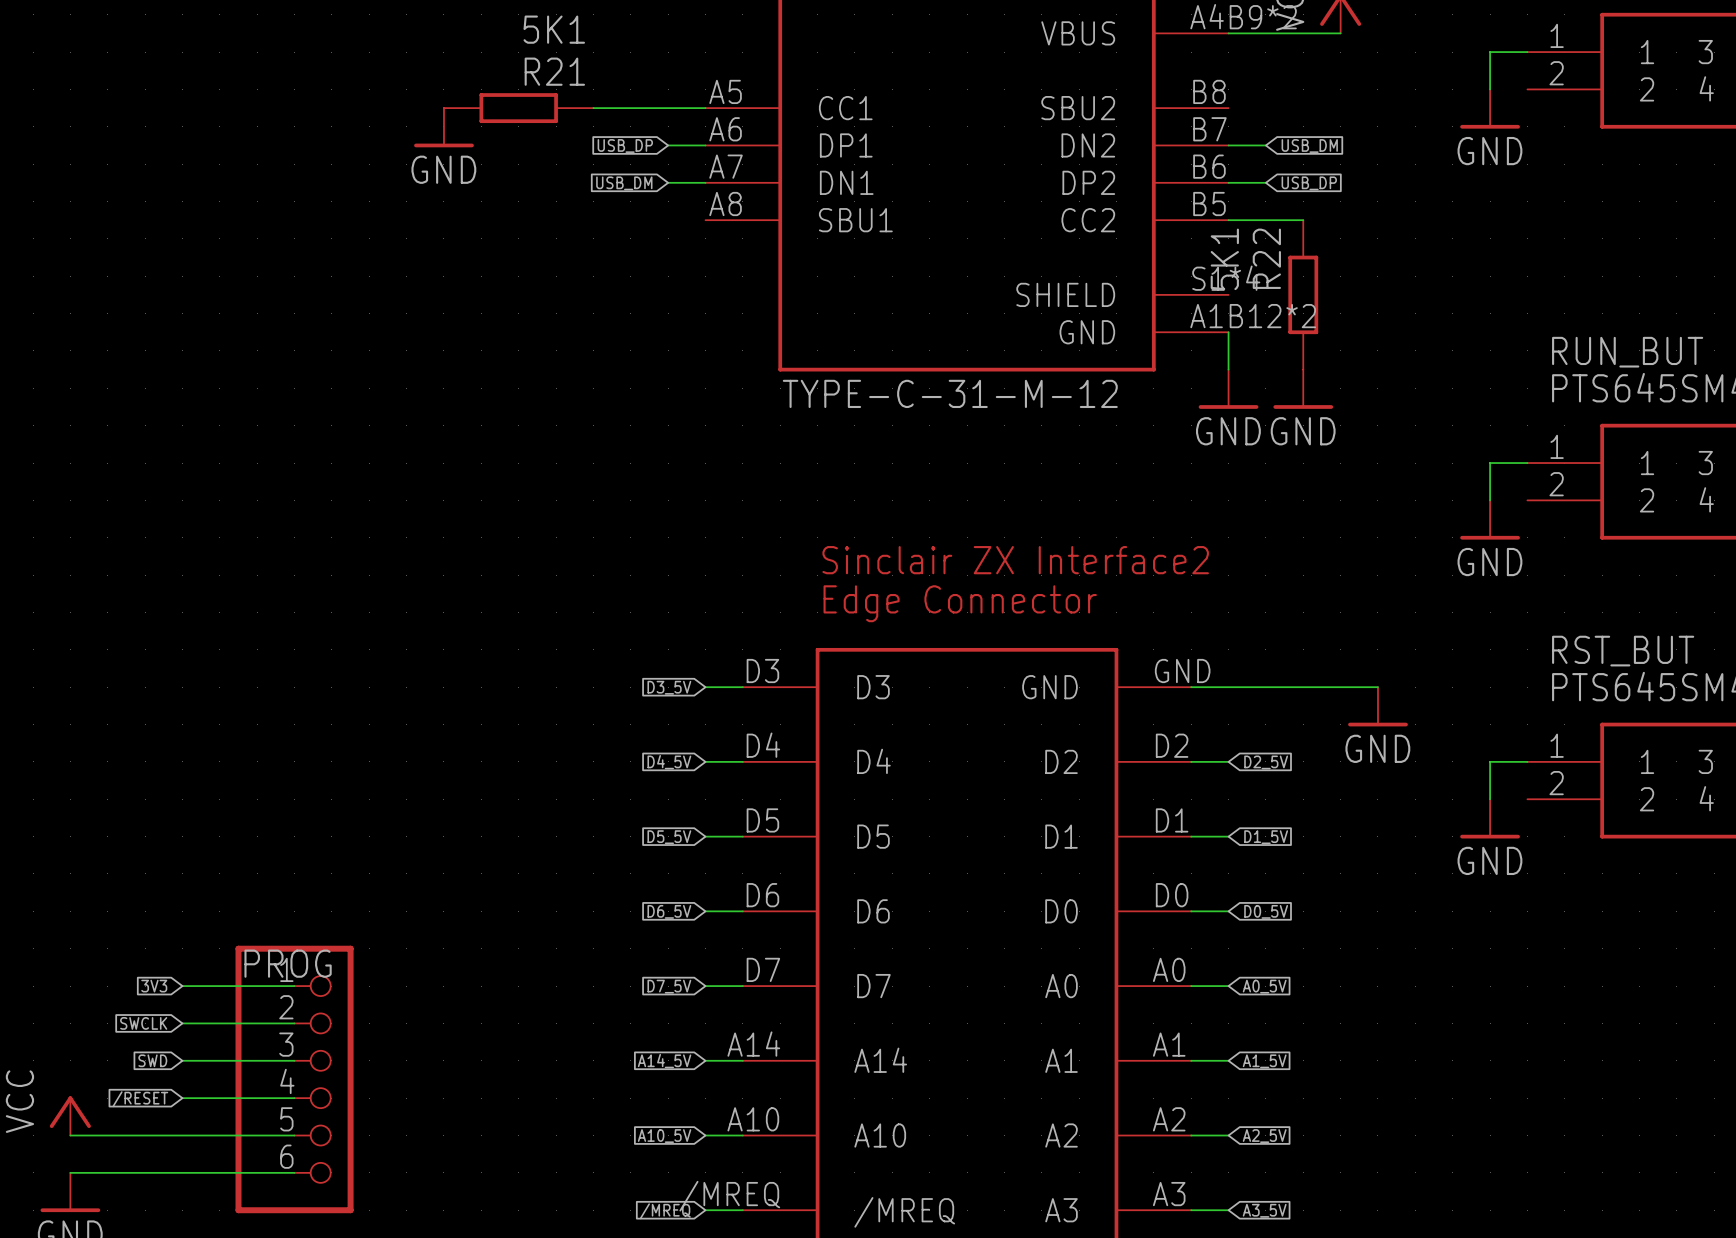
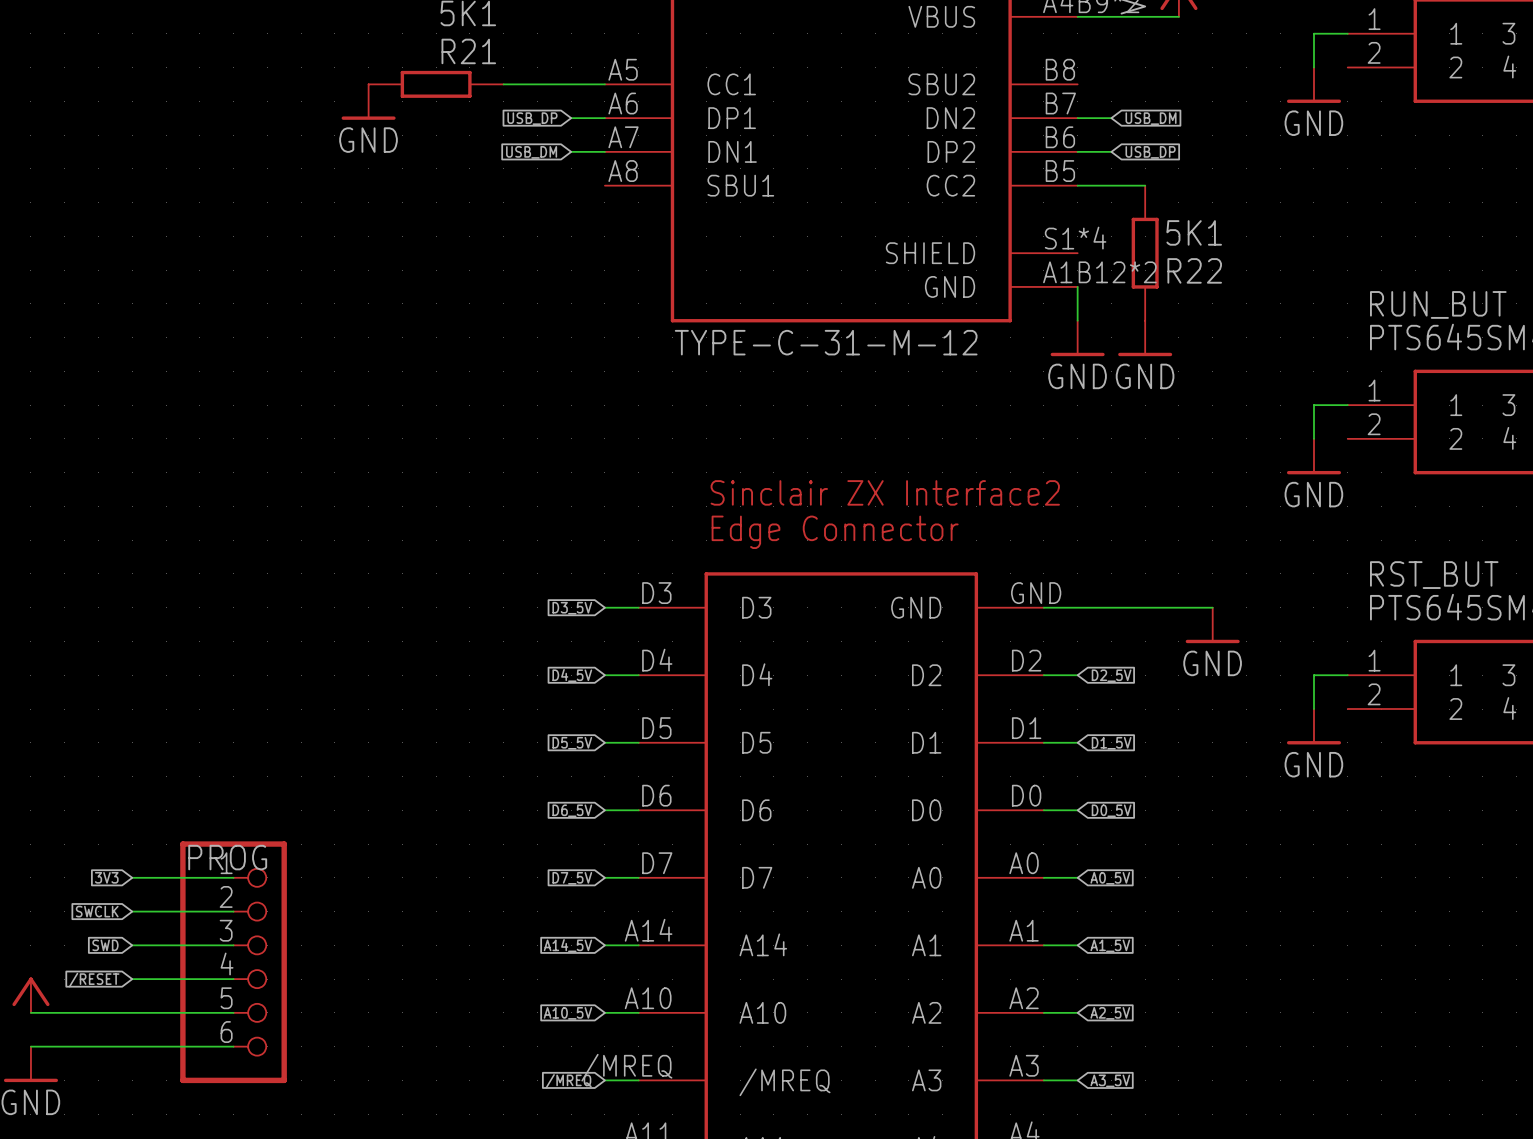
R22 name rotation: 0° (1266, 258) -> 90° clockwise (1194, 270)
R22 name position: R22 (1266, 258) -> R22 (1194, 270)
R22 value rotation: 0° (1224, 259) -> 90° clockwise (1194, 232)
R22 value position: 5K1 (1224, 259) -> 5K1 (1194, 232)

